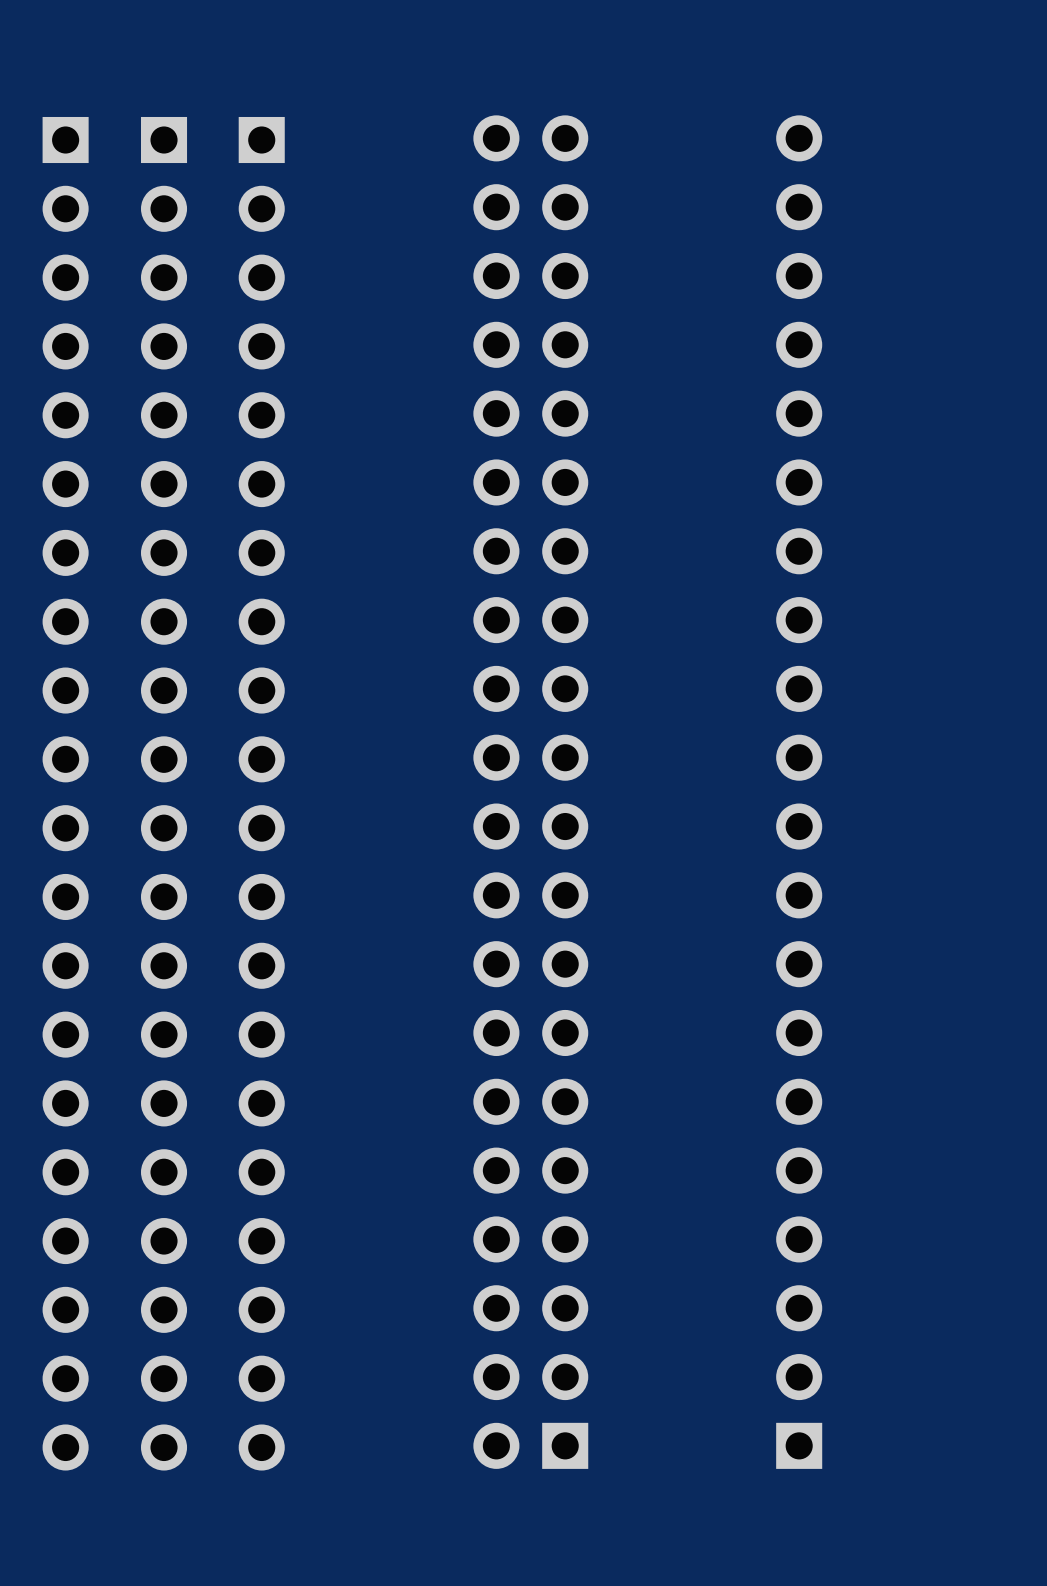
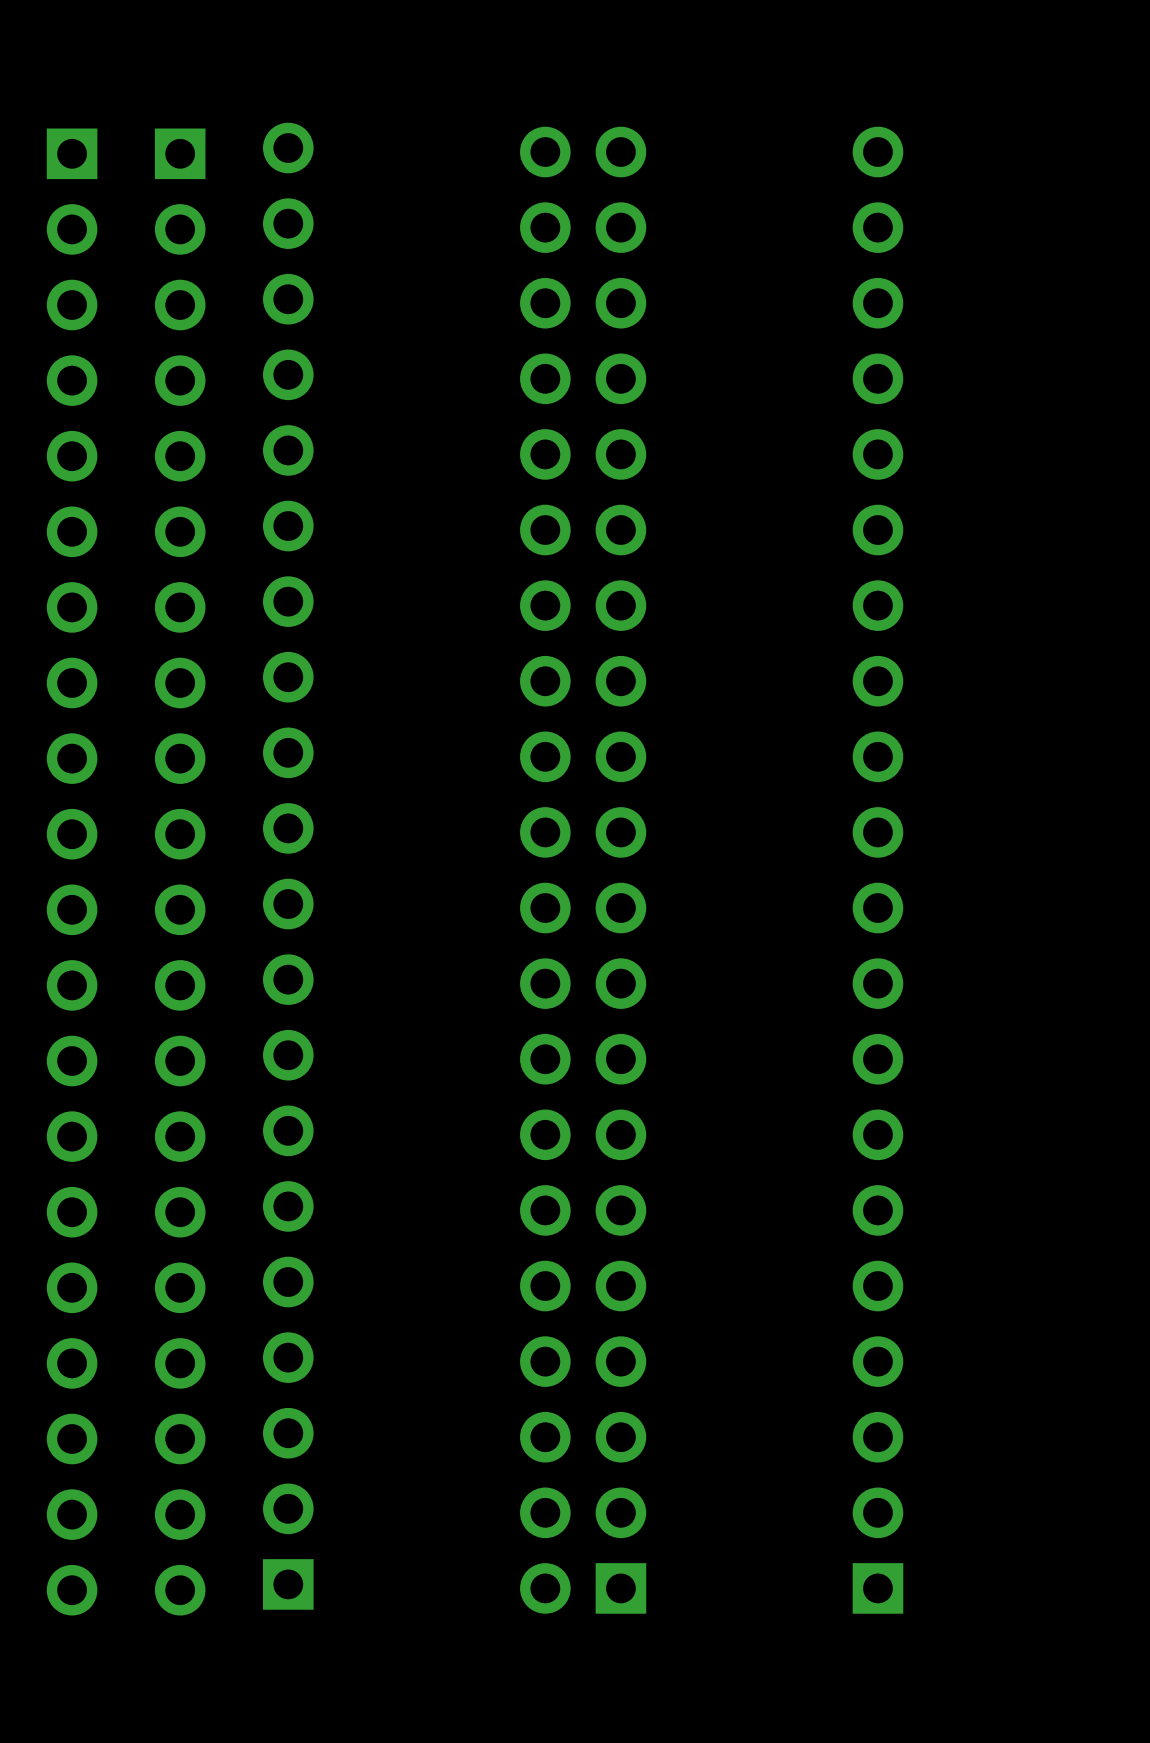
part rotation: 0° (261, 793) -> 180° (288, 866)

